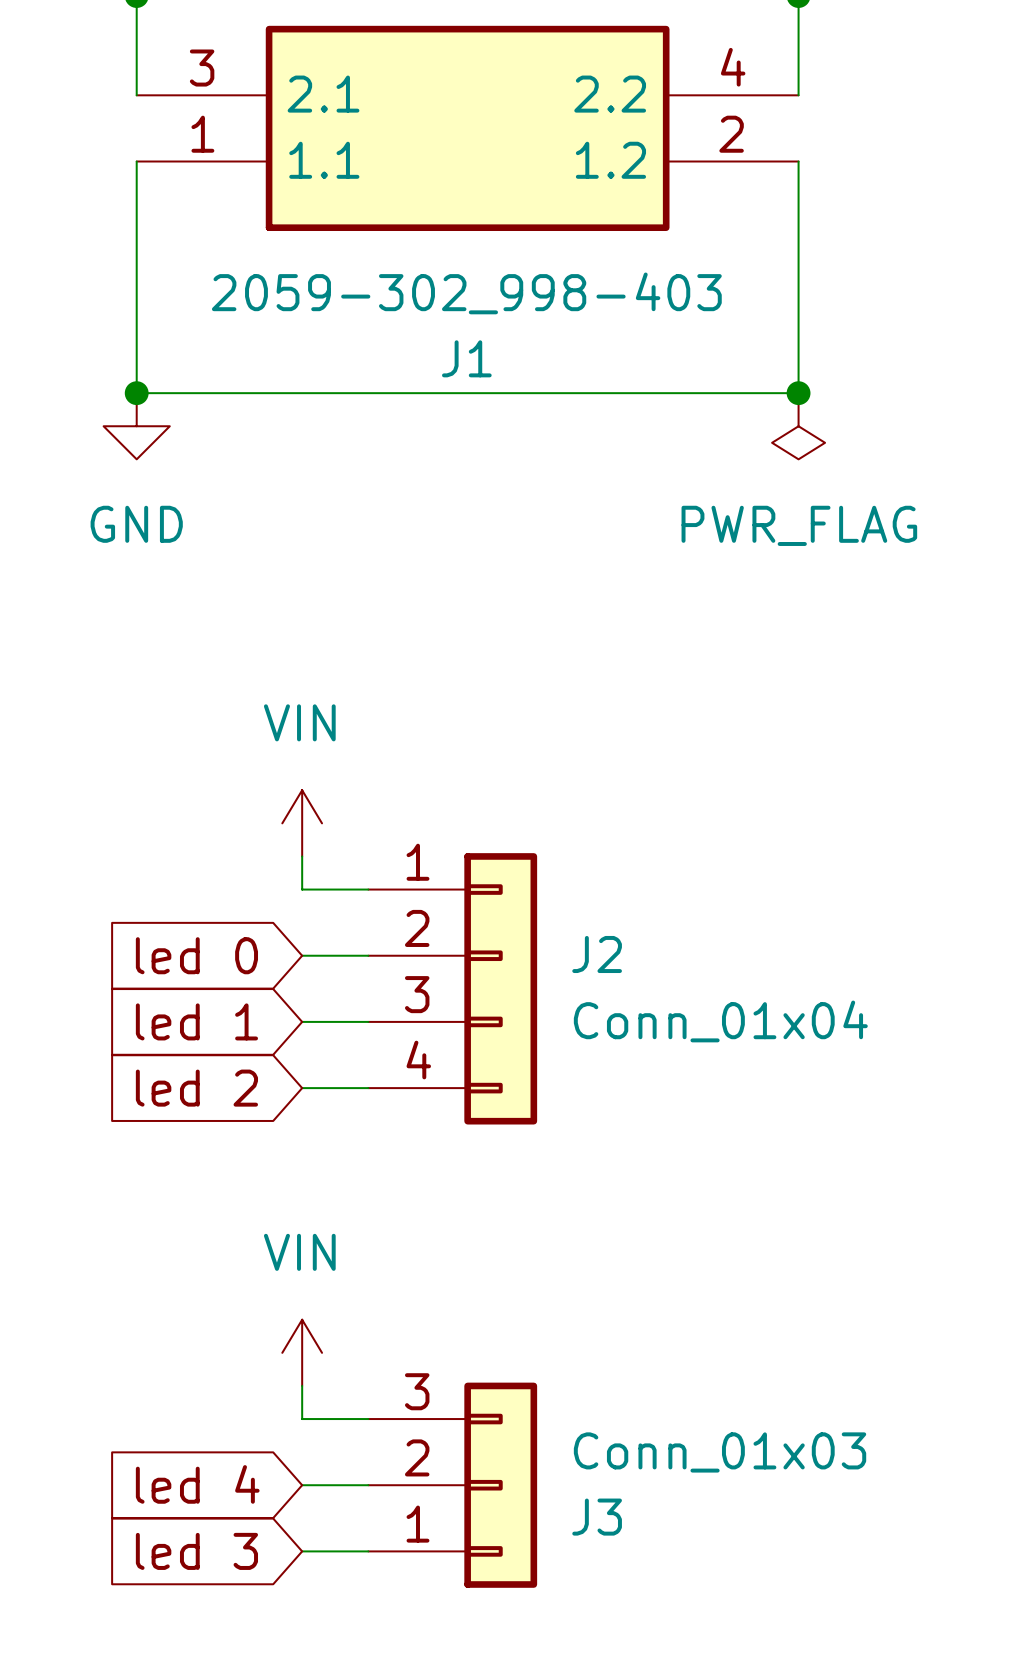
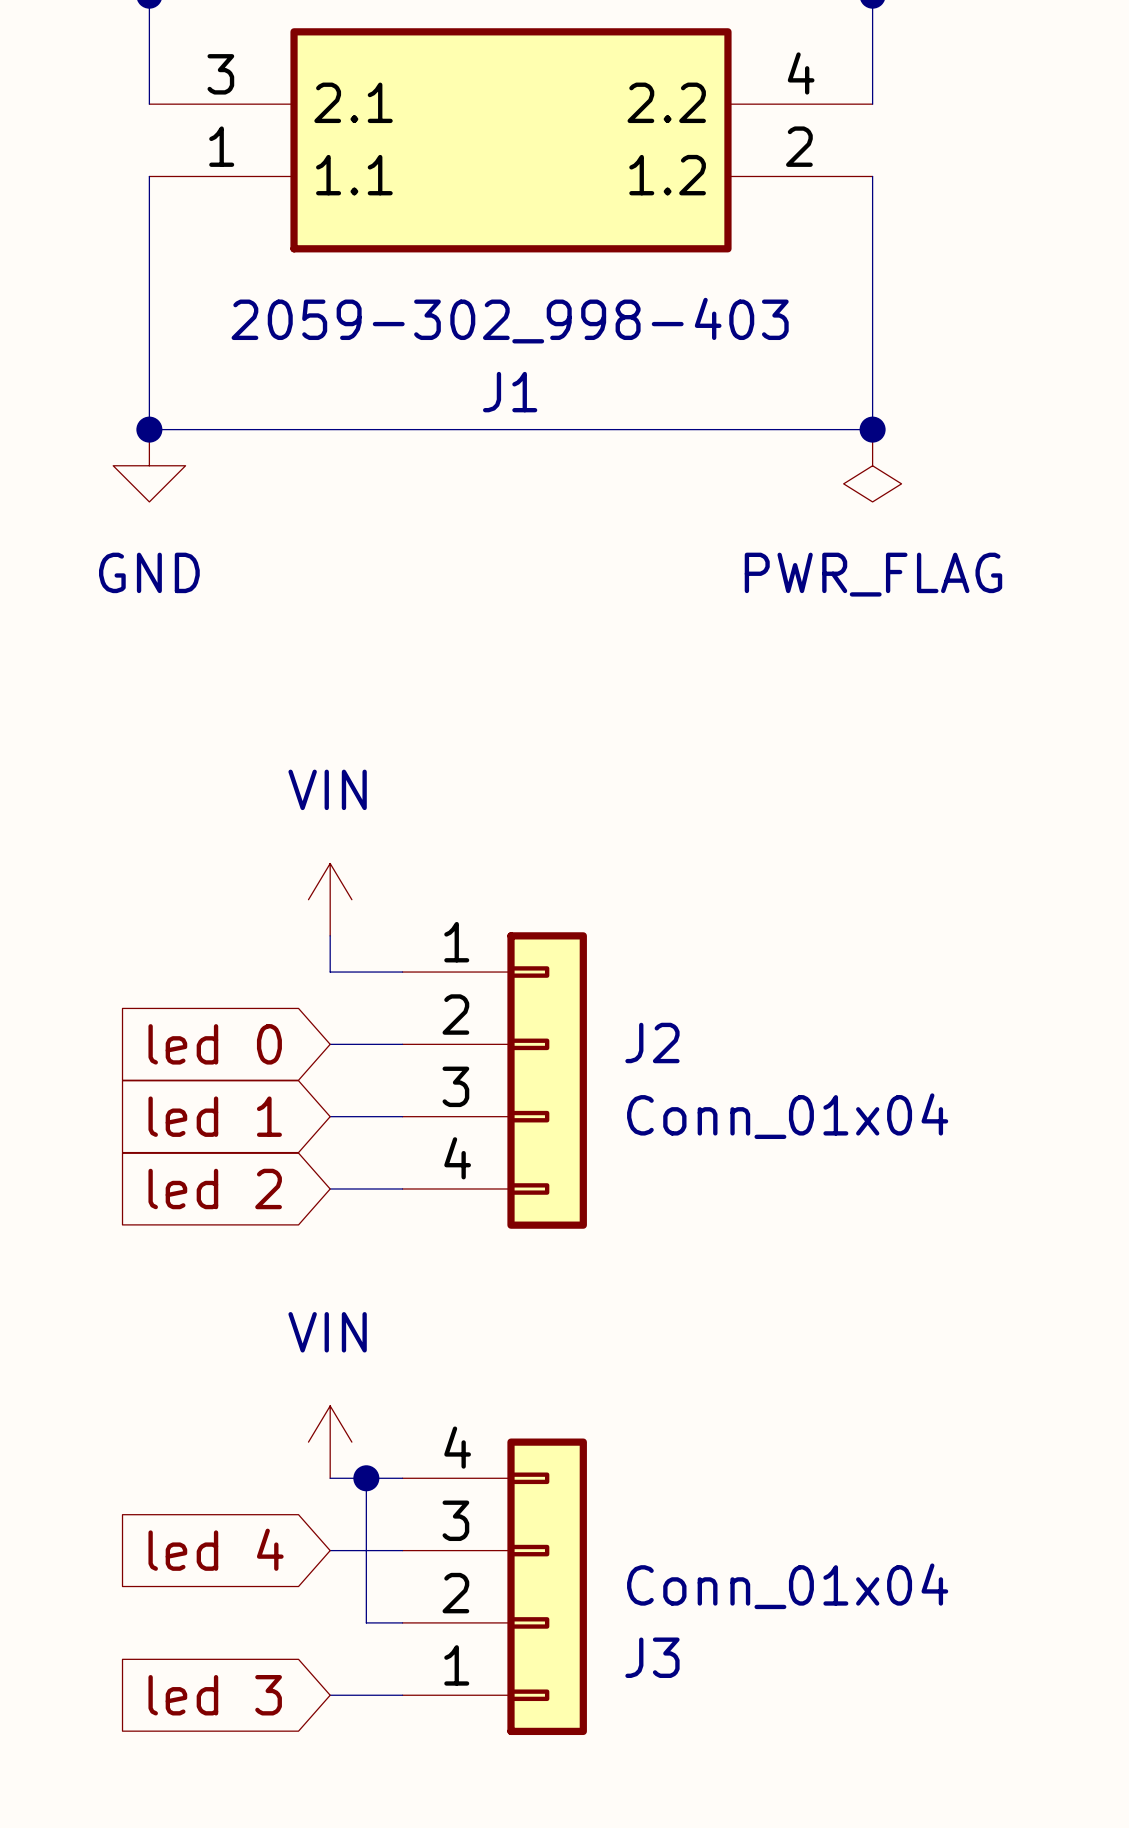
wire: none -> (330, 1478) (402, 1478)
power symbol position: VIN (302, 1352) -> VIN (330, 1442)
junction: none -> (366, 1478)
J3 symbol: [368, 1382, 538, 1588] -> [402, 1438, 587, 1736]
wire: (302, 1385) (302, 1419) -> none
J3 value: Conn_01x03 (720, 1452) -> Conn_01x04 (787, 1586)
global label position: led 4 (197, 1484) -> led 4 (216, 1549)
wire: (302, 1485) (335, 1485) -> (366, 1478) (366, 1622)

